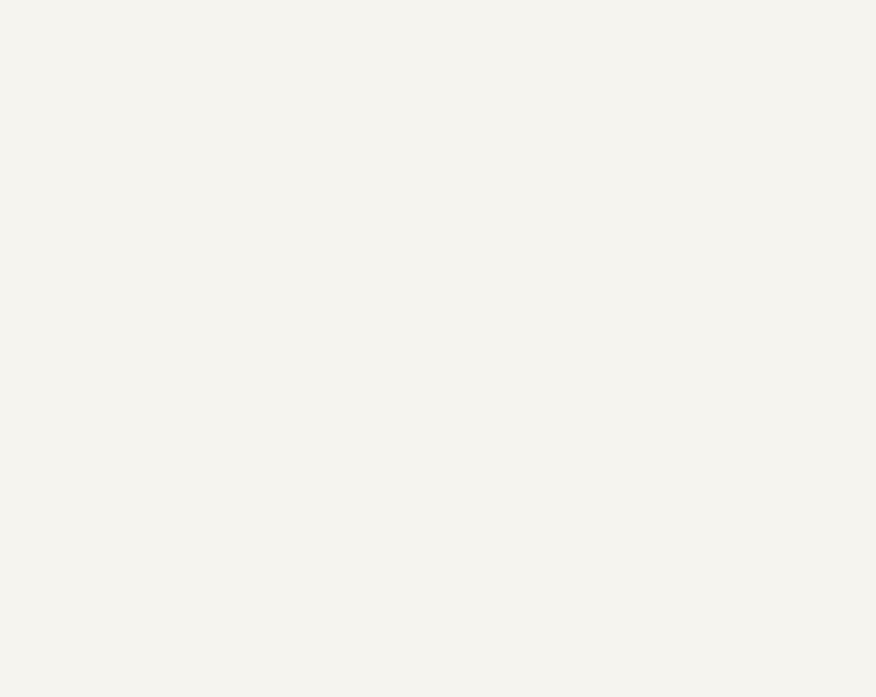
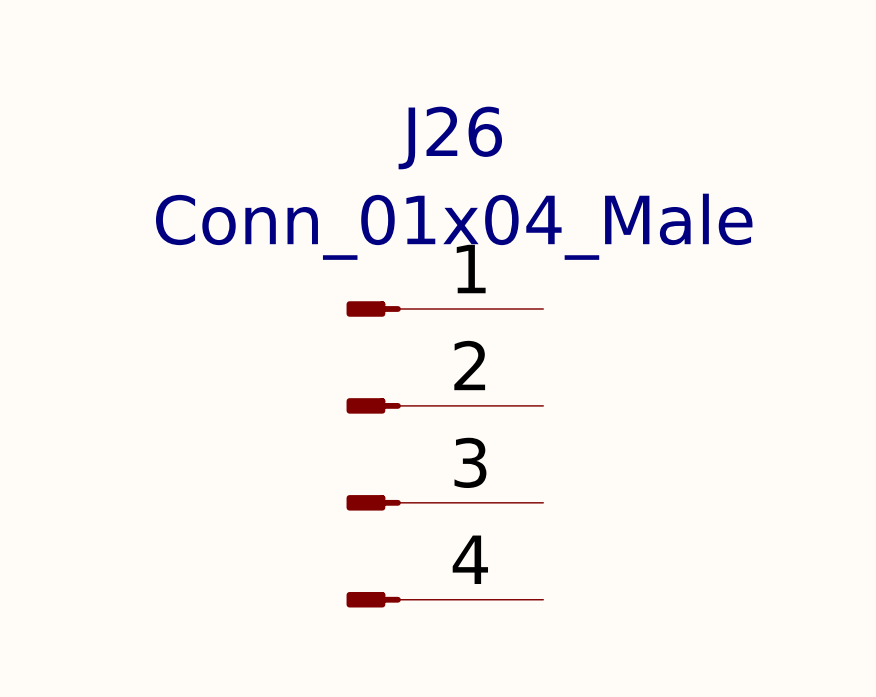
J26: none -> Conn_01x04_Male (444, 454)

